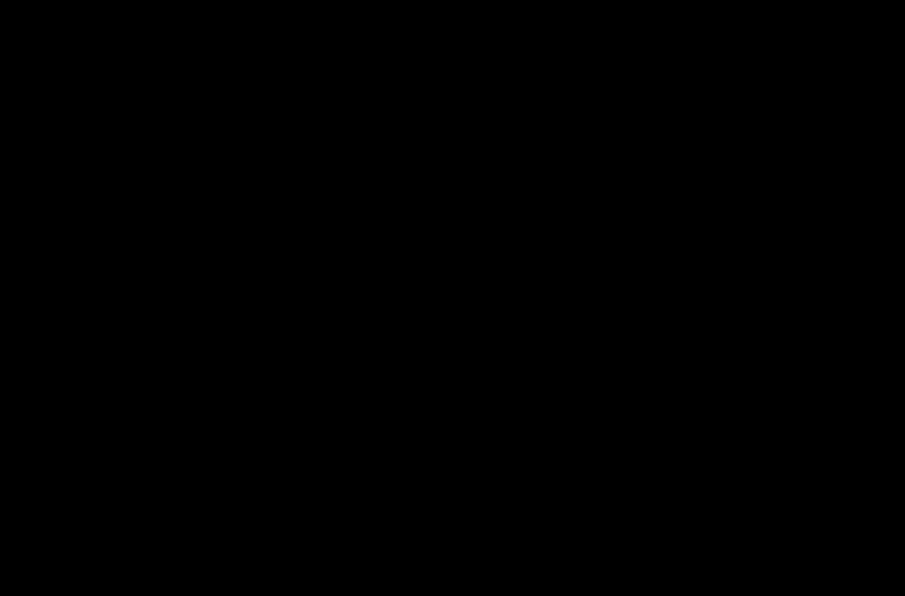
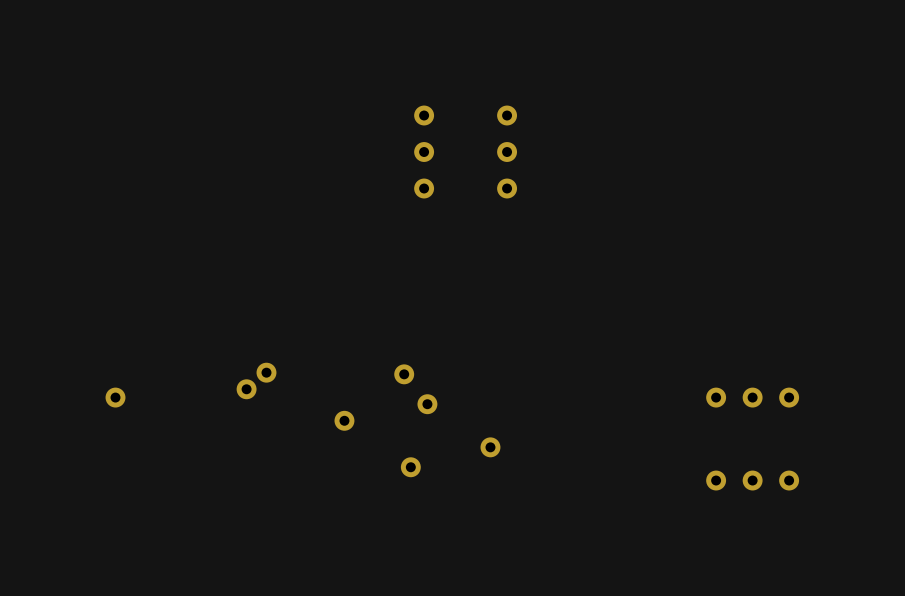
via: none -> (424, 115)
via: none -> (507, 115)
via: none -> (424, 152)
via: none -> (507, 152)
via: none -> (424, 188)
via: none -> (507, 188)
via: none -> (266, 372)
via: none -> (404, 374)
via: none -> (246, 389)
via: none -> (115, 397)
via: none -> (716, 397)
via: none -> (752, 397)
via: none -> (789, 397)
via: none -> (427, 404)
via: none -> (344, 420)
via: none -> (490, 447)
via: none -> (410, 467)
via: none -> (716, 480)
via: none -> (752, 480)
via: none -> (789, 480)

